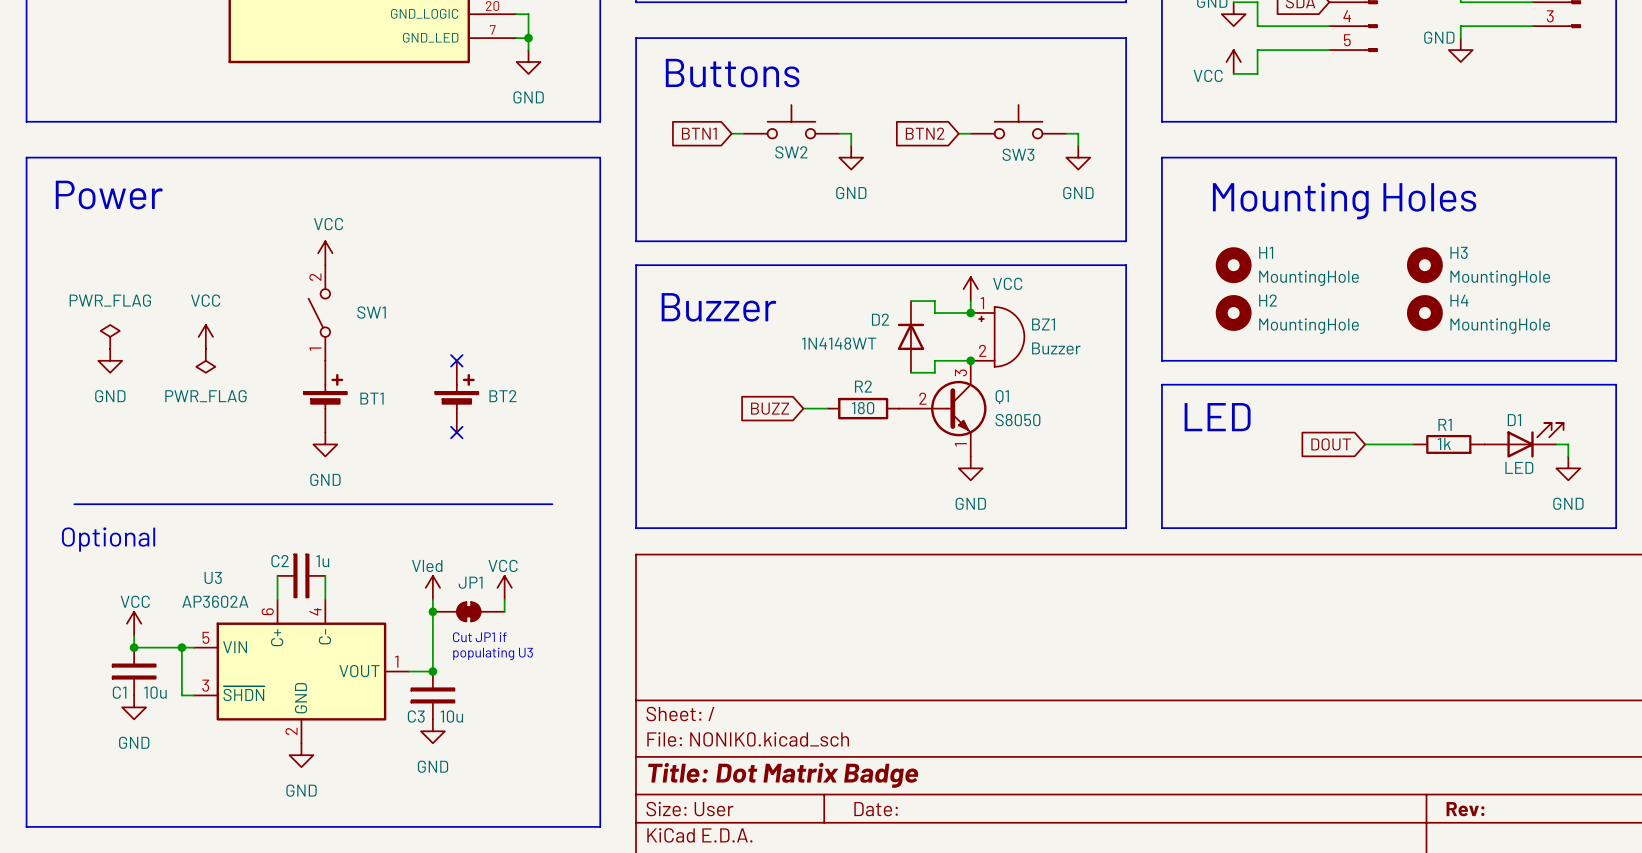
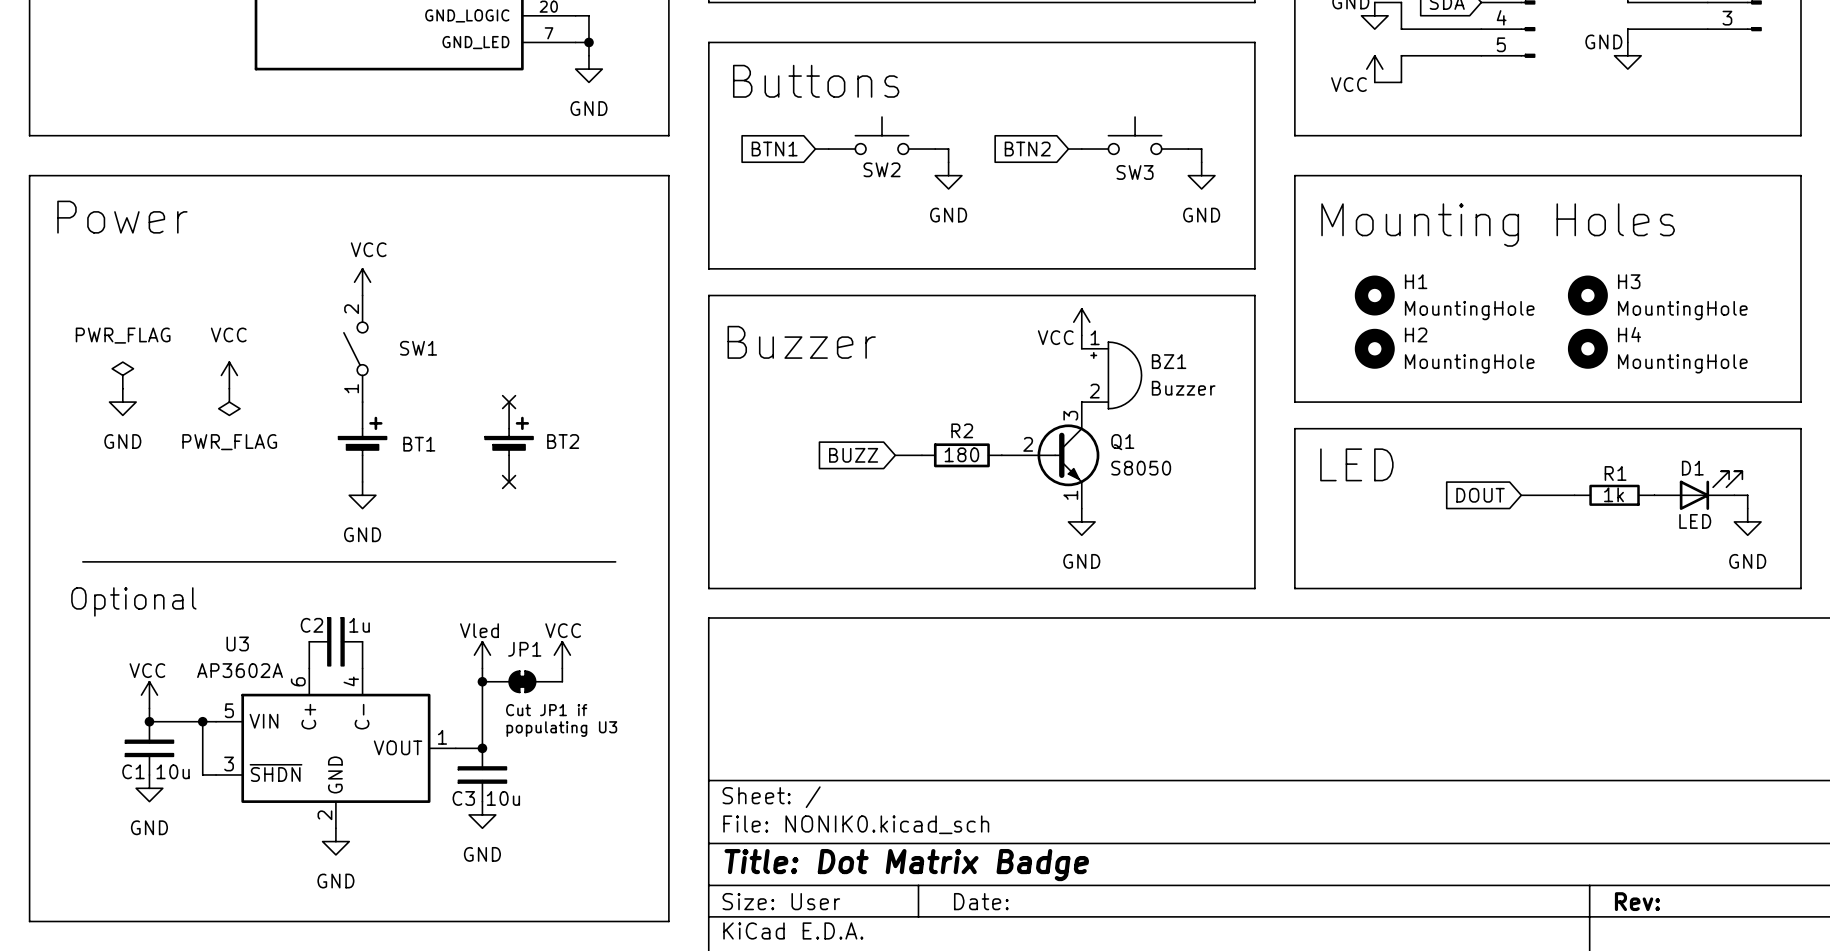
power symbol text position: VCC (1007, 283) -> VCC (1055, 337)
wire: (910, 301) (934, 301) (934, 312) (970, 312) -> none
junction: (970, 312) -> none
D2: 1N4148WT (910, 336) -> none
wire: (970, 360) (934, 360) (934, 372) (910, 372) -> none
junction: (970, 360) -> none

